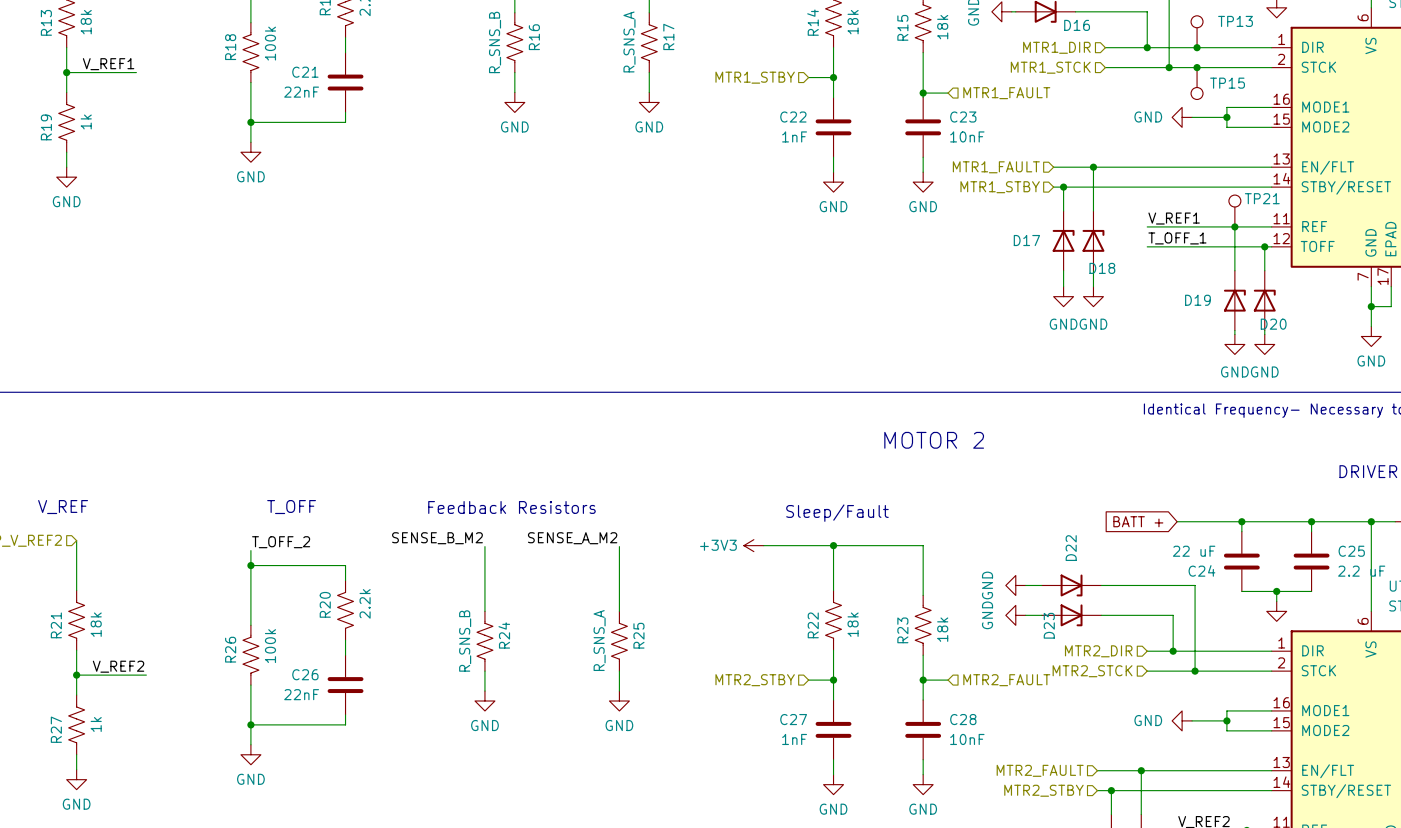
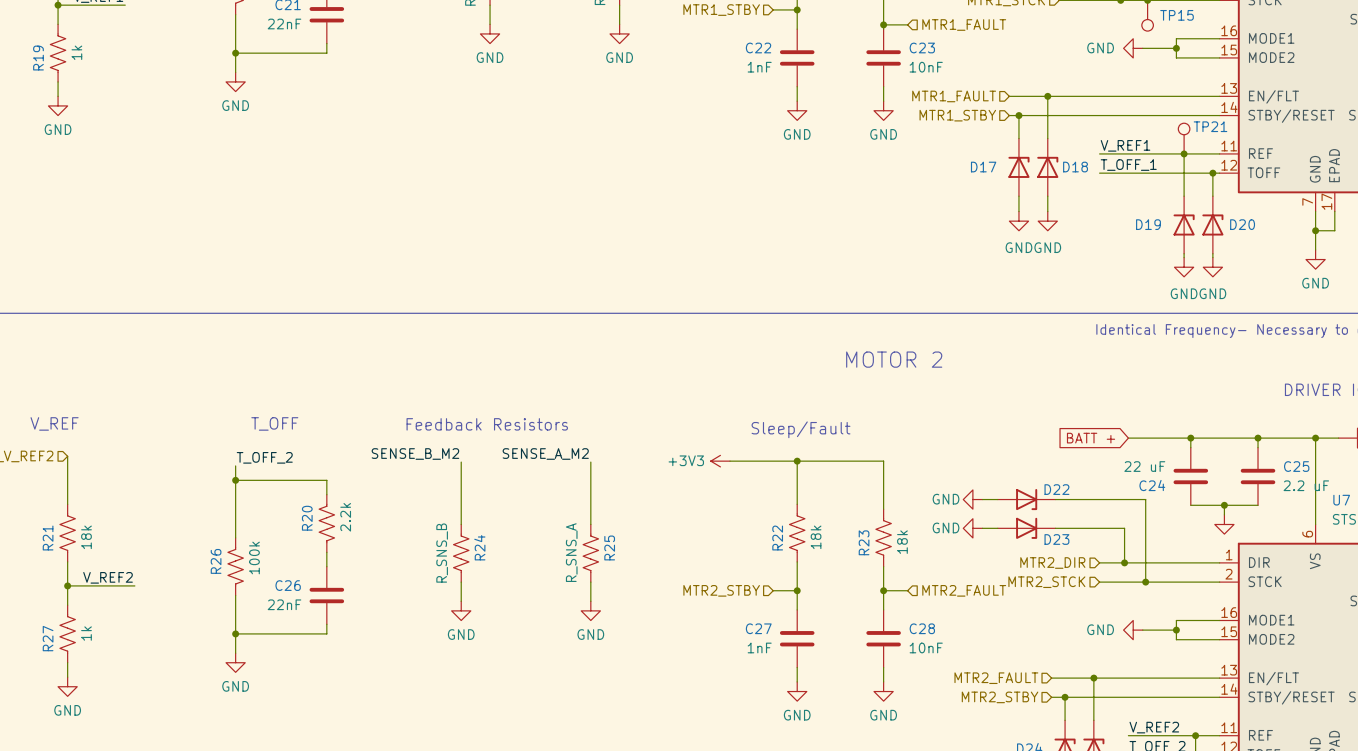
D18 name position: D18 (1102, 268) -> D18 (1075, 167)
D20 name position: D20 (1273, 324) -> D20 (1242, 224)
D22 name rotation: 0° (1071, 548) -> 90° clockwise (1056, 489)
D22 name position: D22 (1071, 548) -> D22 (1056, 489)
power symbol text rotation: 0° (987, 585) -> 90° clockwise (946, 499)
power symbol text rotation: 0° (987, 615) -> 90° clockwise (946, 527)
D23 name rotation: 0° (1049, 625) -> 90° clockwise (1056, 539)
D23 name position: D23 (1049, 625) -> D23 (1056, 539)

